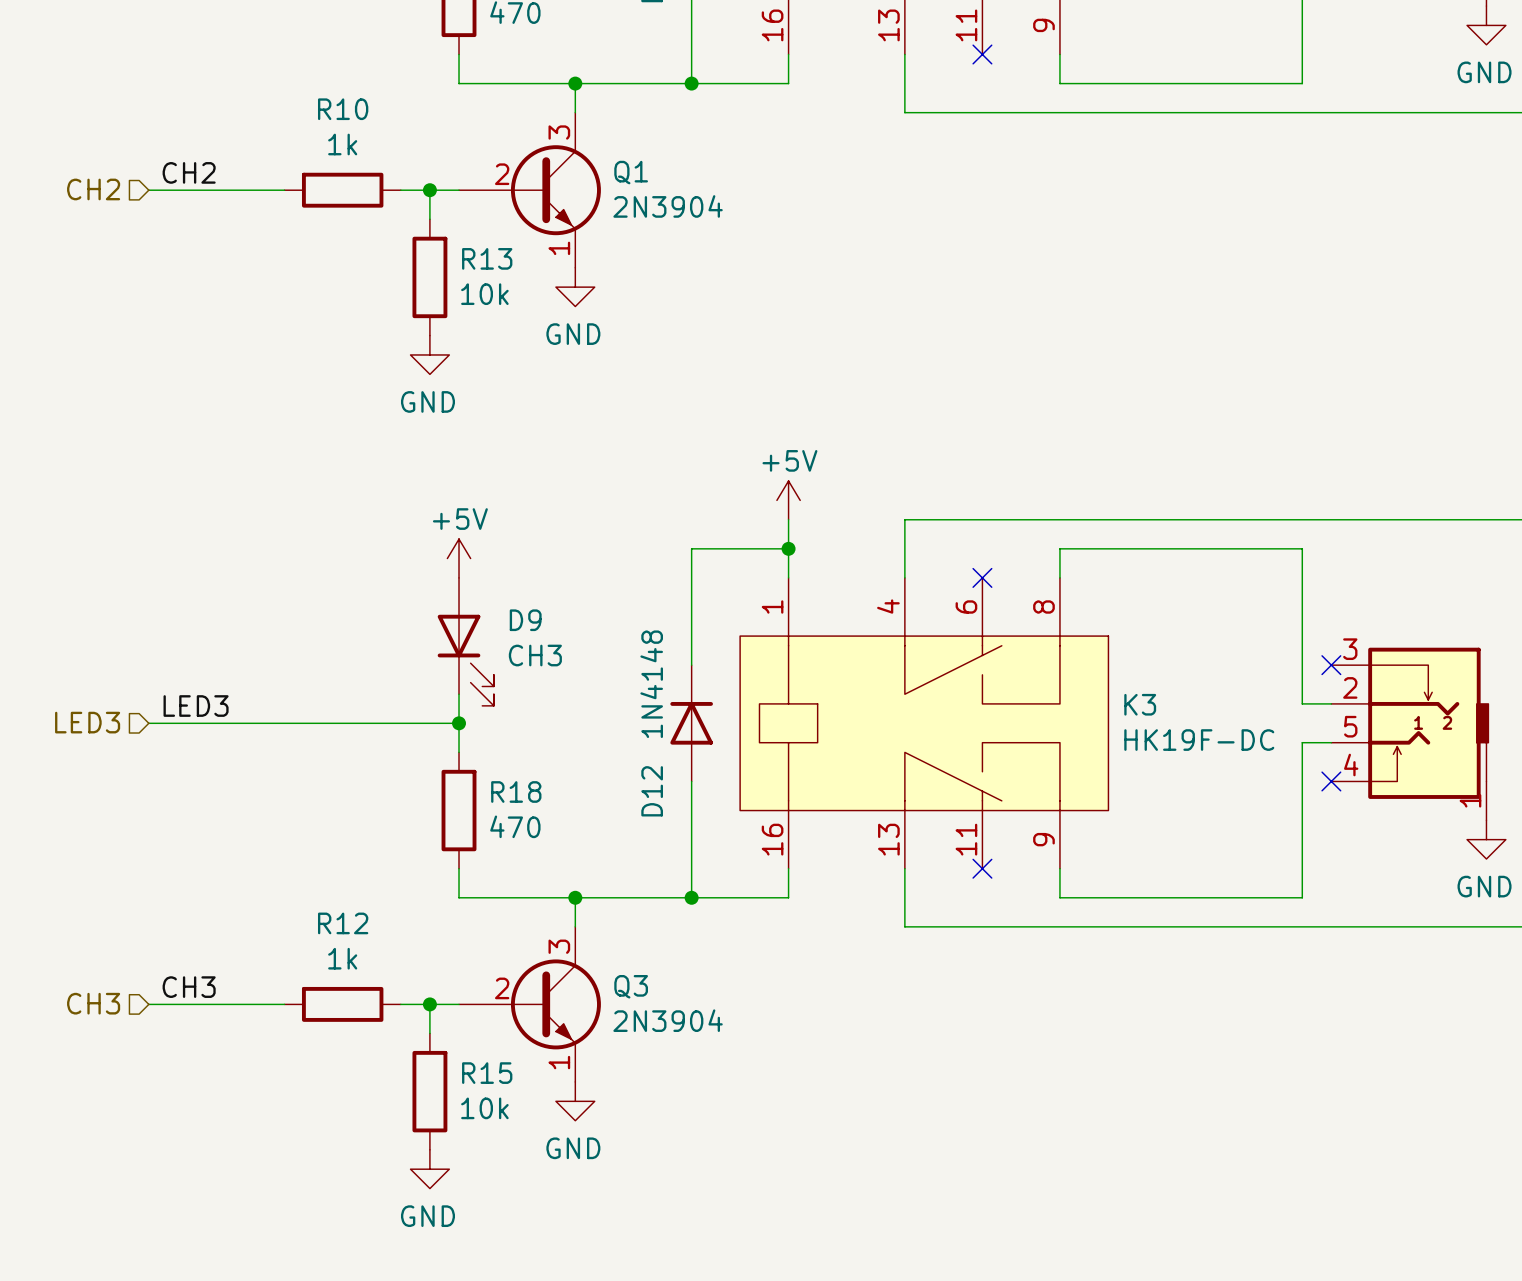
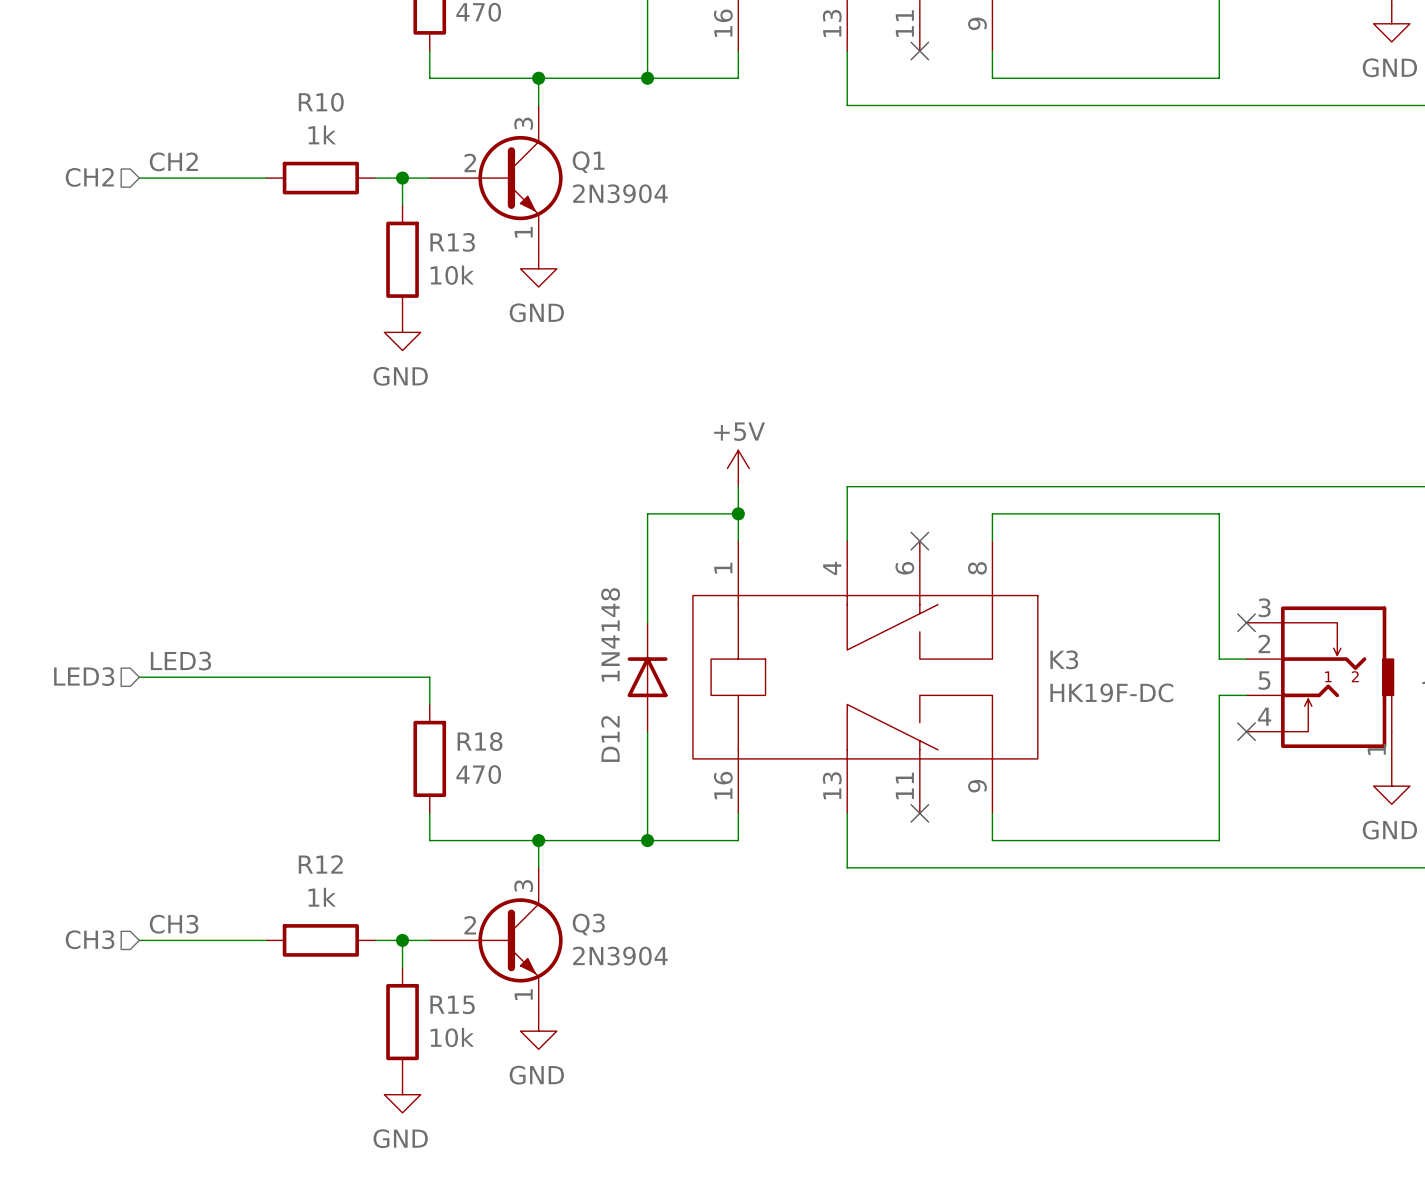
power symbol: +5V (459, 558) -> none
D9: CH3 (465, 641) -> none
wire: (459, 694) (459, 723) -> none
junction: (459, 723) -> none

